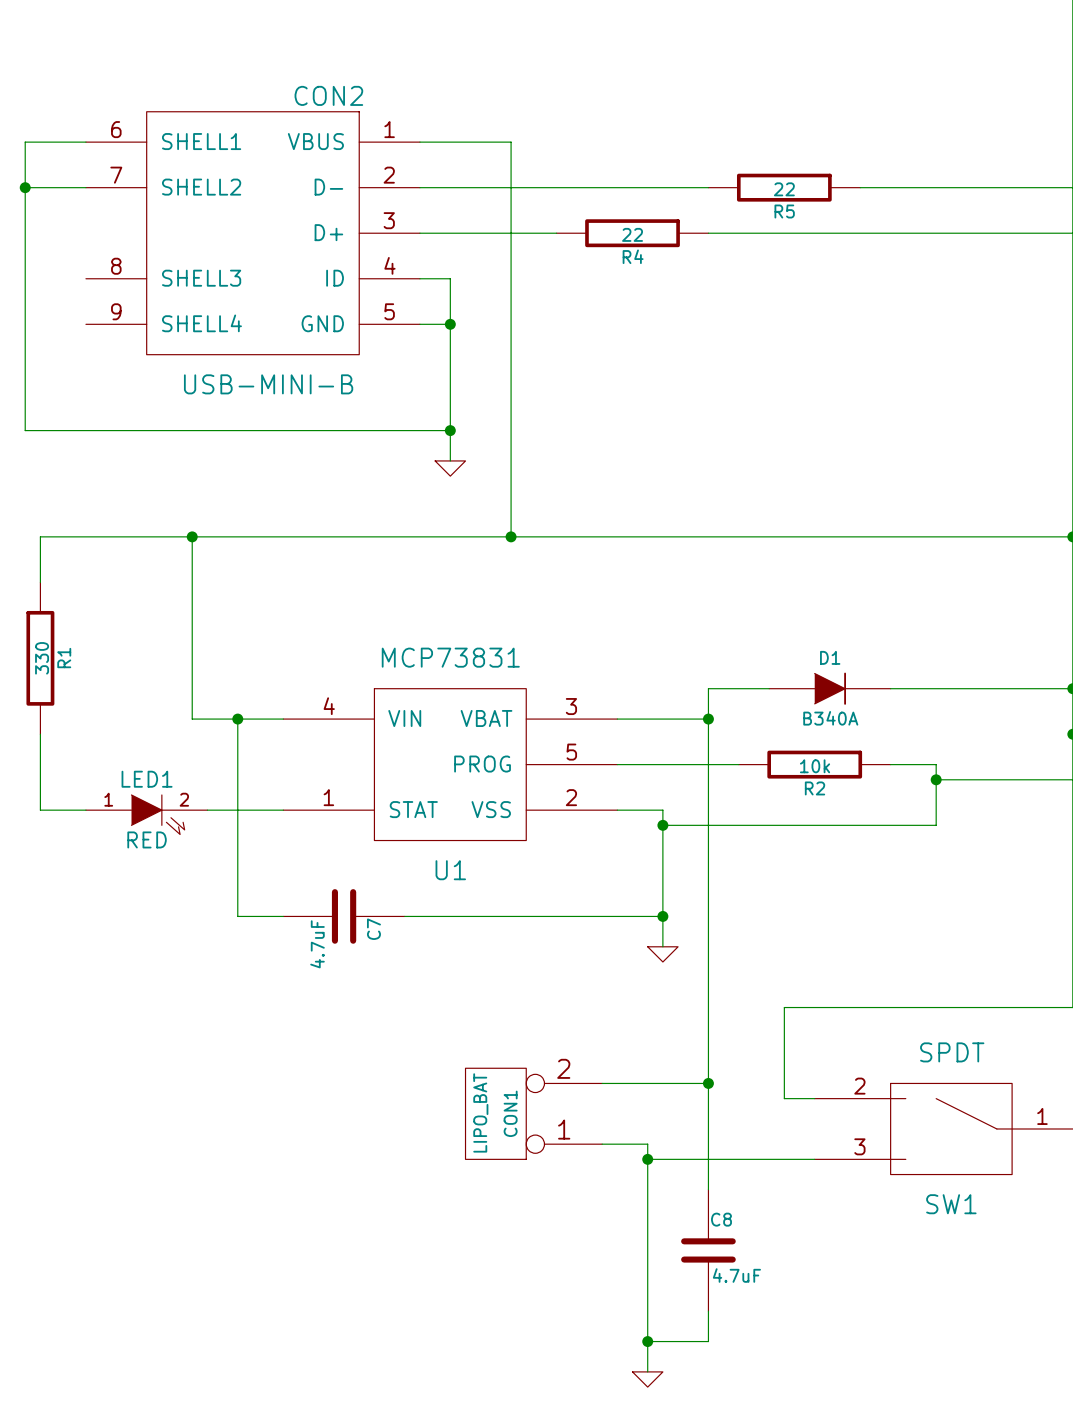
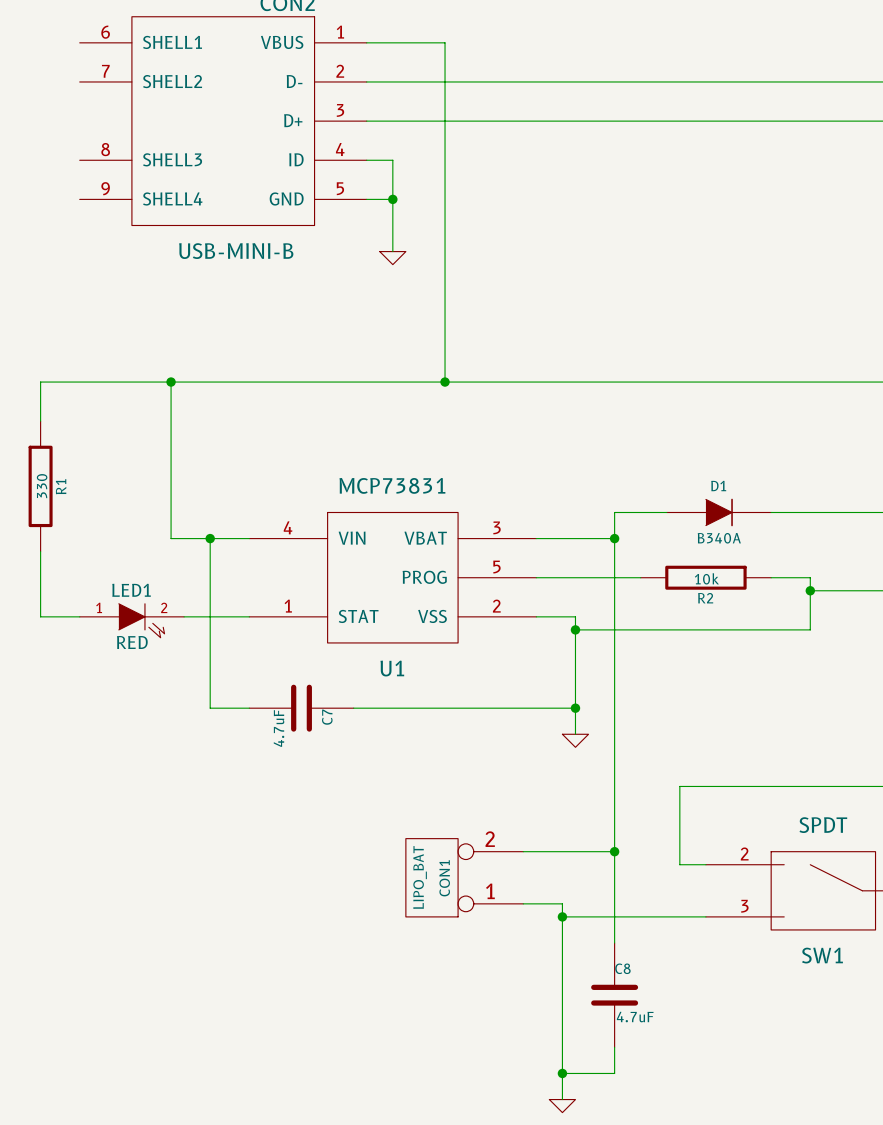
wire: (85, 142) (25, 142) (25, 430) (450, 430) -> none
wire: (25, 187) (85, 187) -> none
junction: (25, 187) -> none
wire: none -> (614, 81) (745, 81)
R5: 22 (784, 187) -> none
wire: none -> (484, 121) (614, 121)
R4: 22 (632, 233) -> none
wire: (450, 385) (450, 460) -> none
junction: (450, 430) -> none
power symbol position: (450, 468) -> (392, 258)

